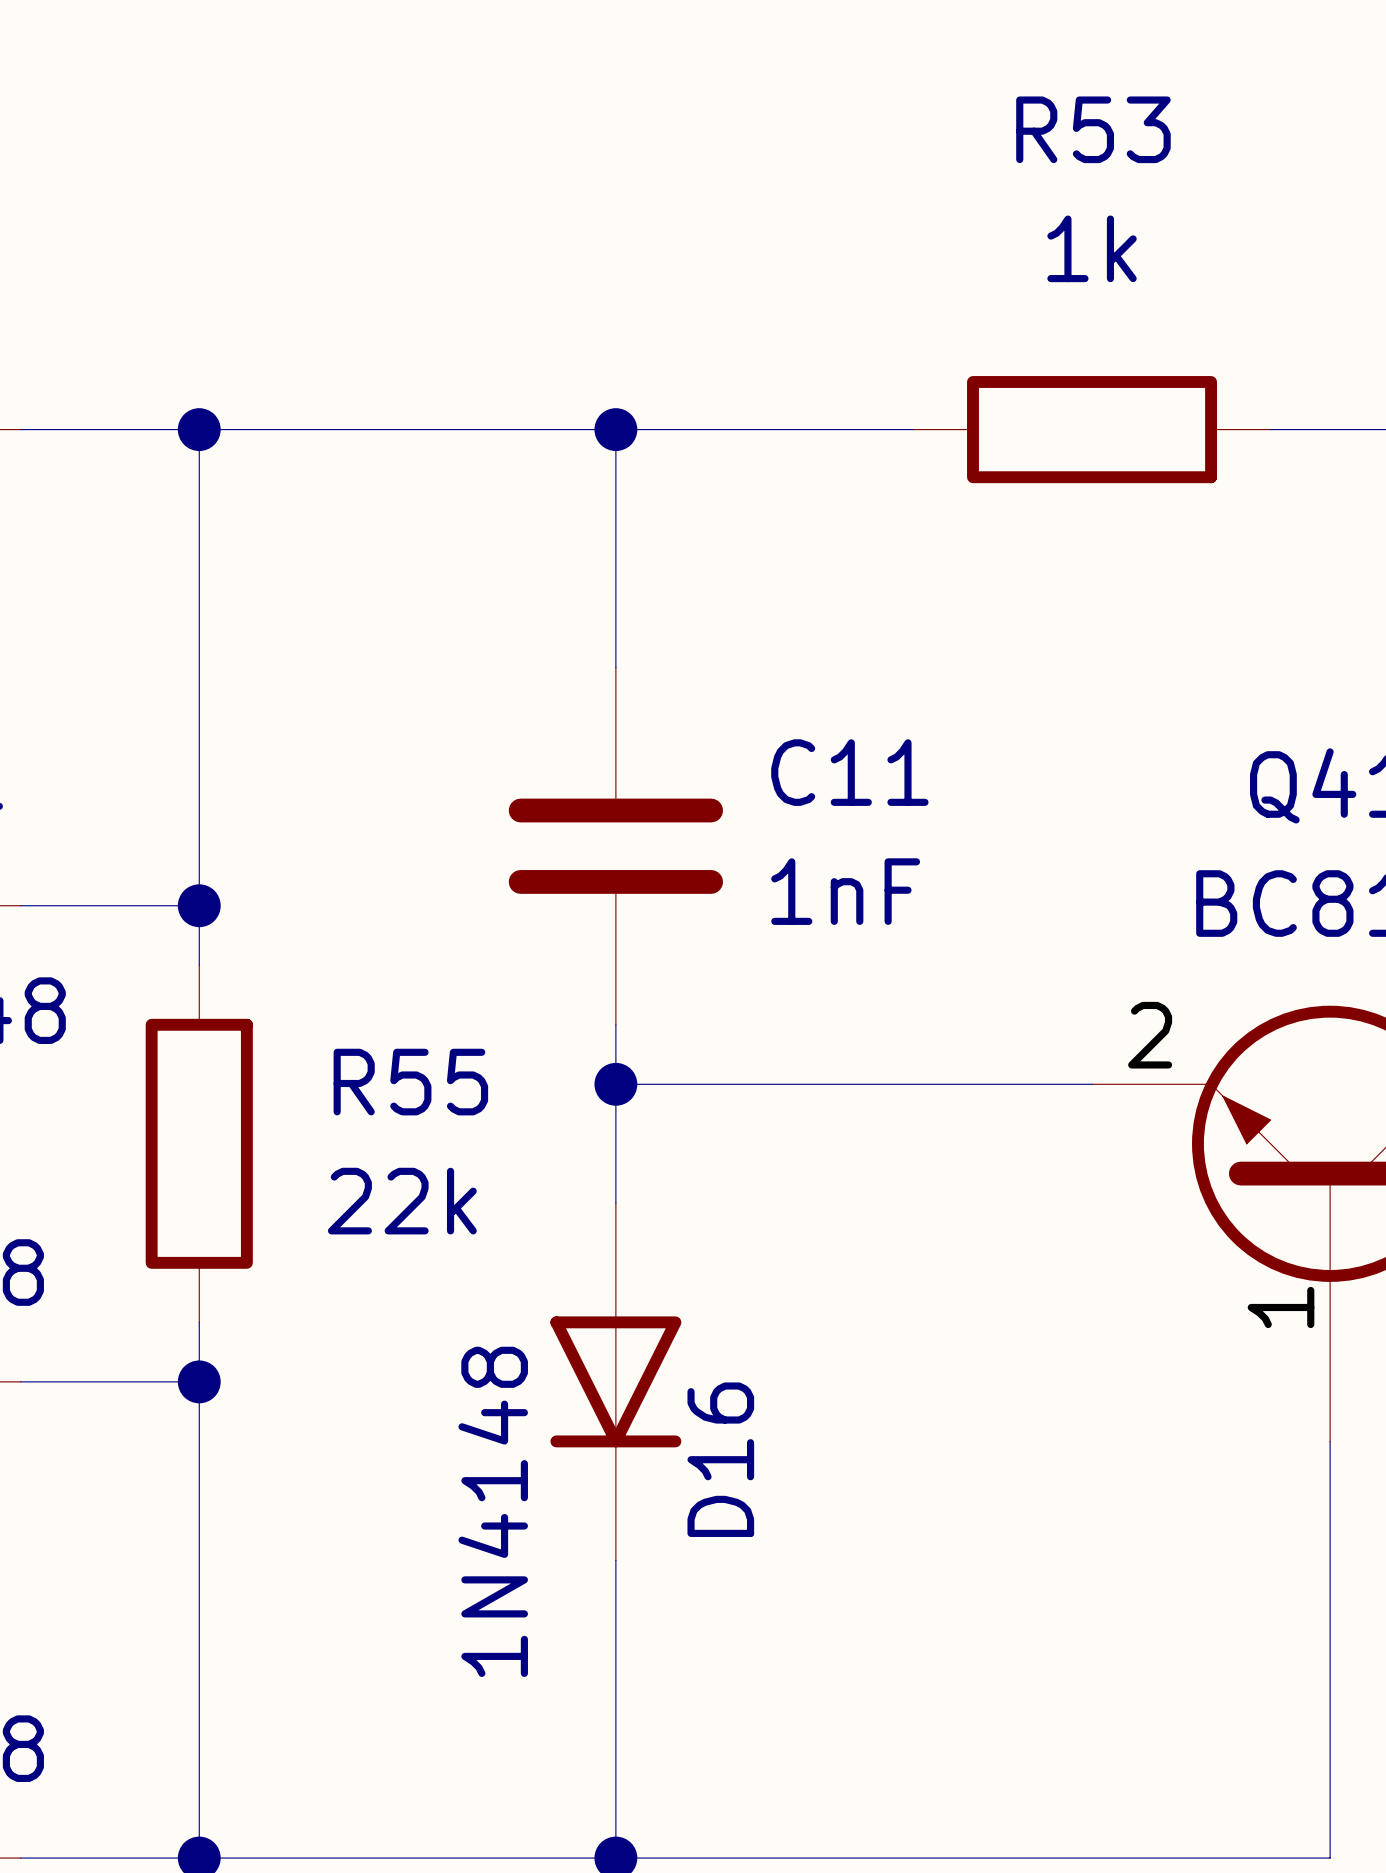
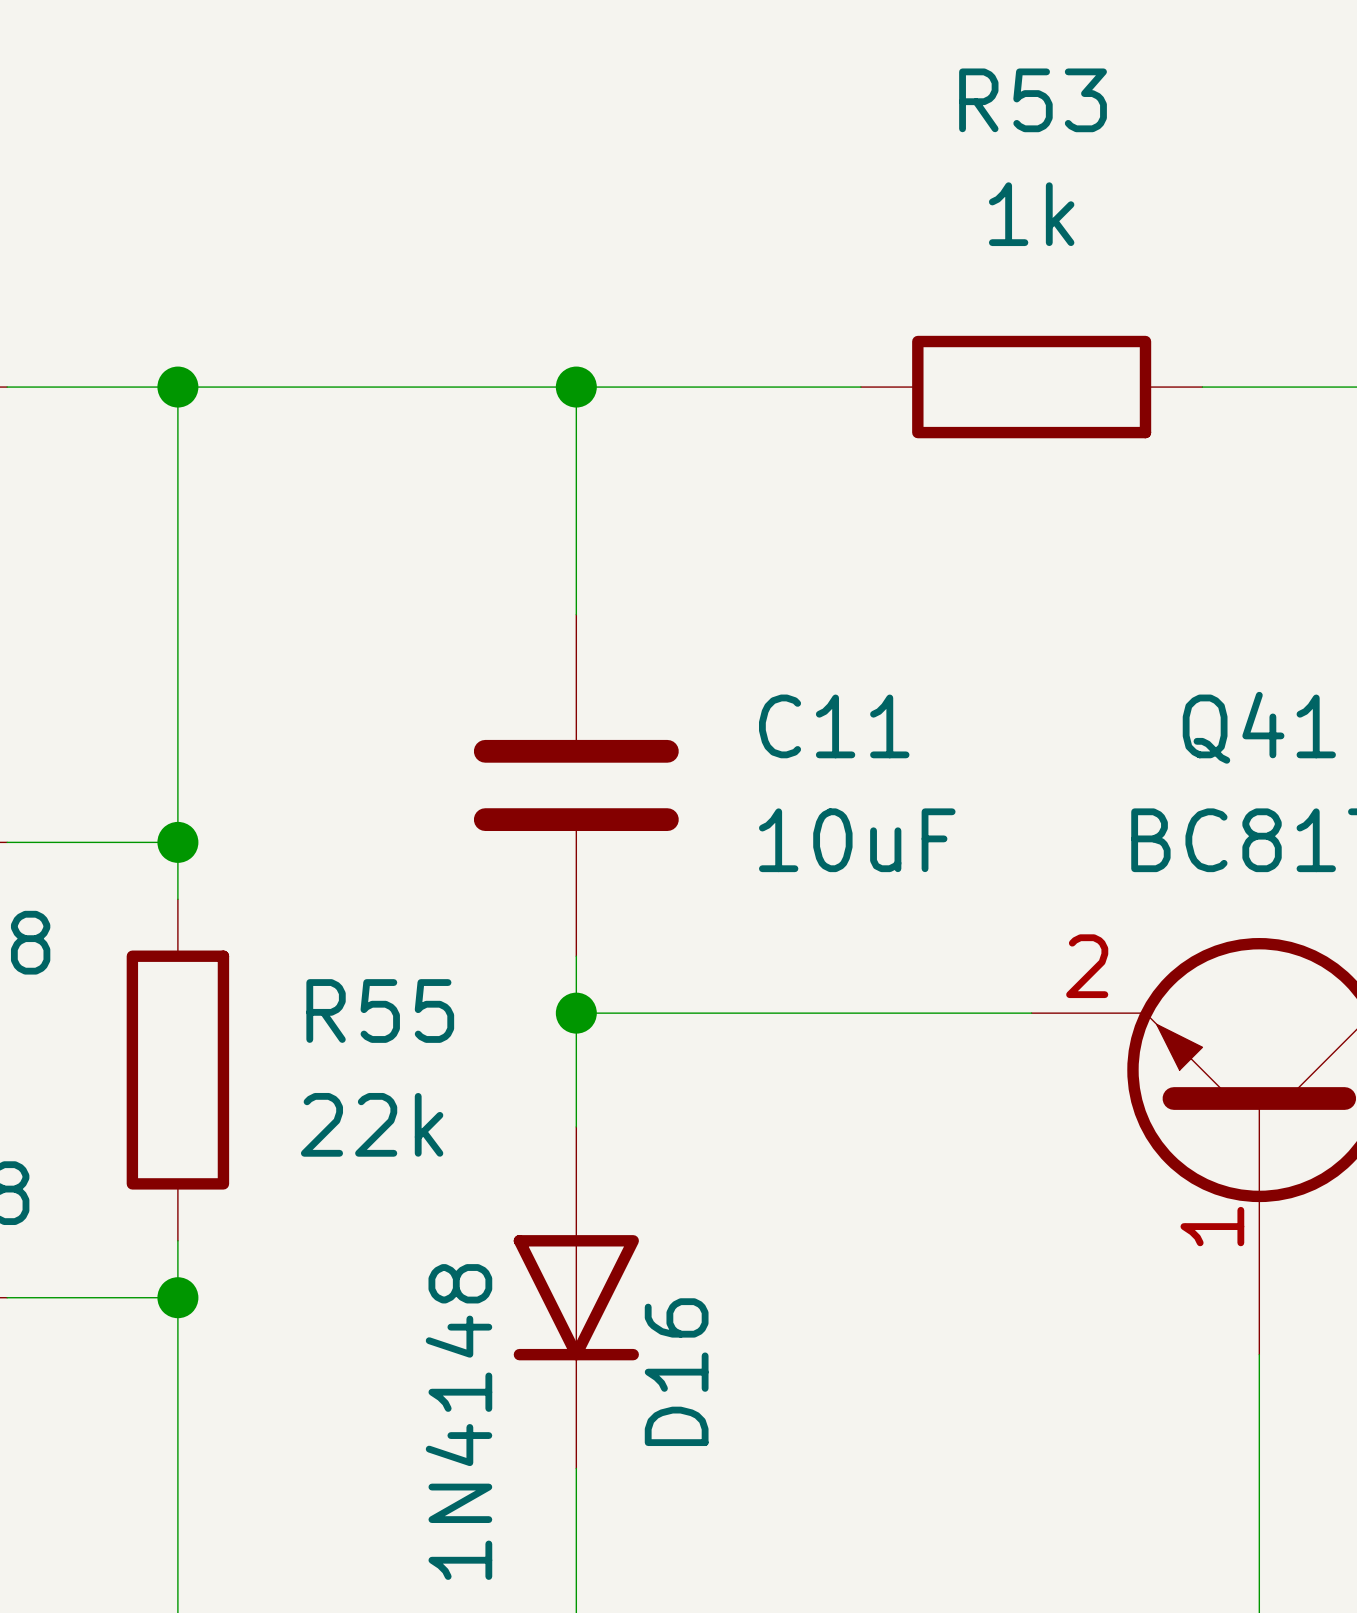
C11 name position: C11 (849, 772) -> C11 (834, 726)
C11 value: 1nF (845, 891) -> 10uF (857, 840)

